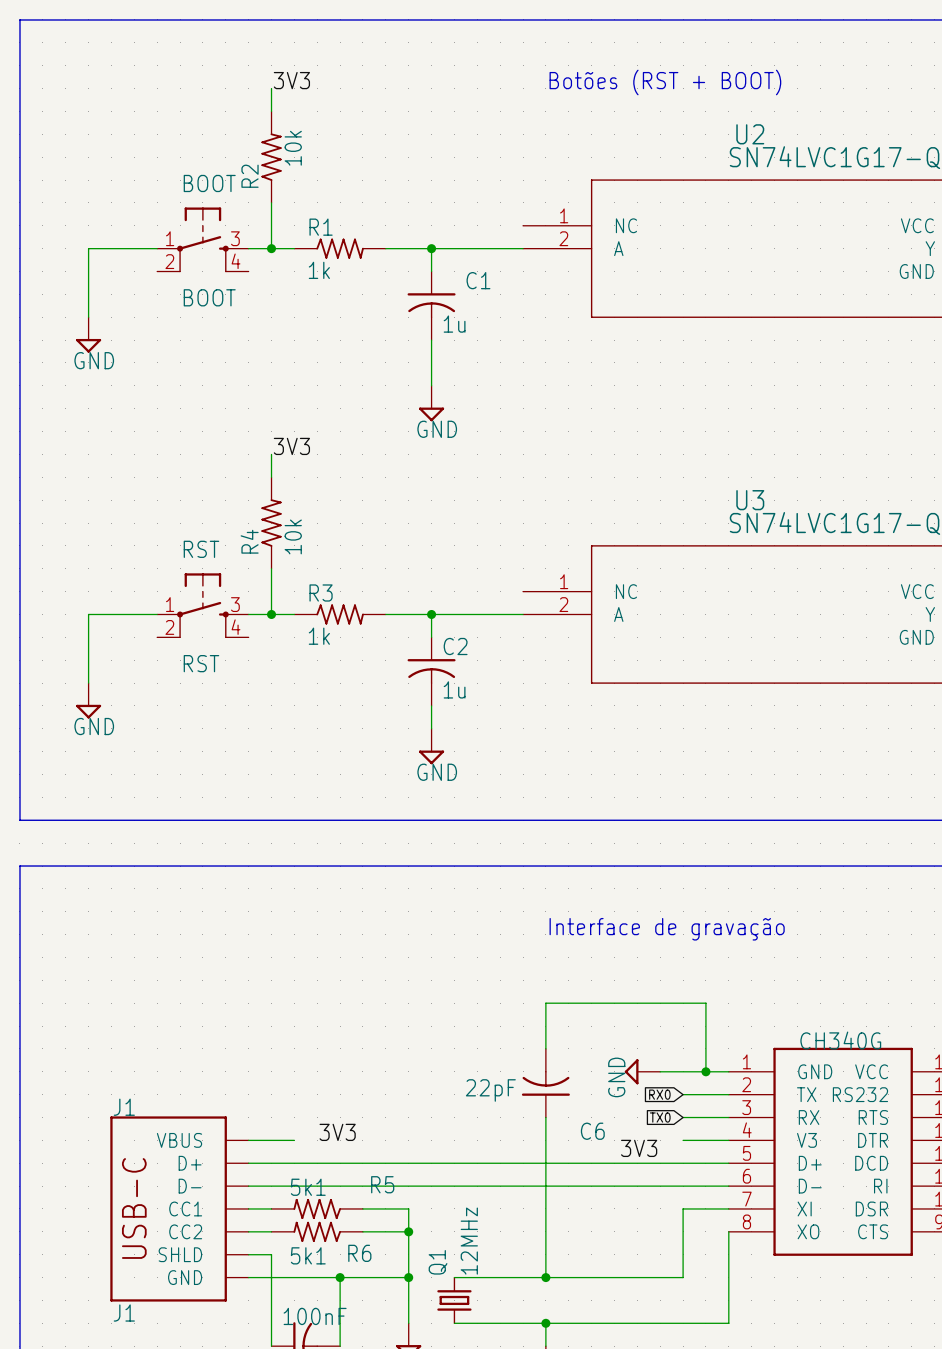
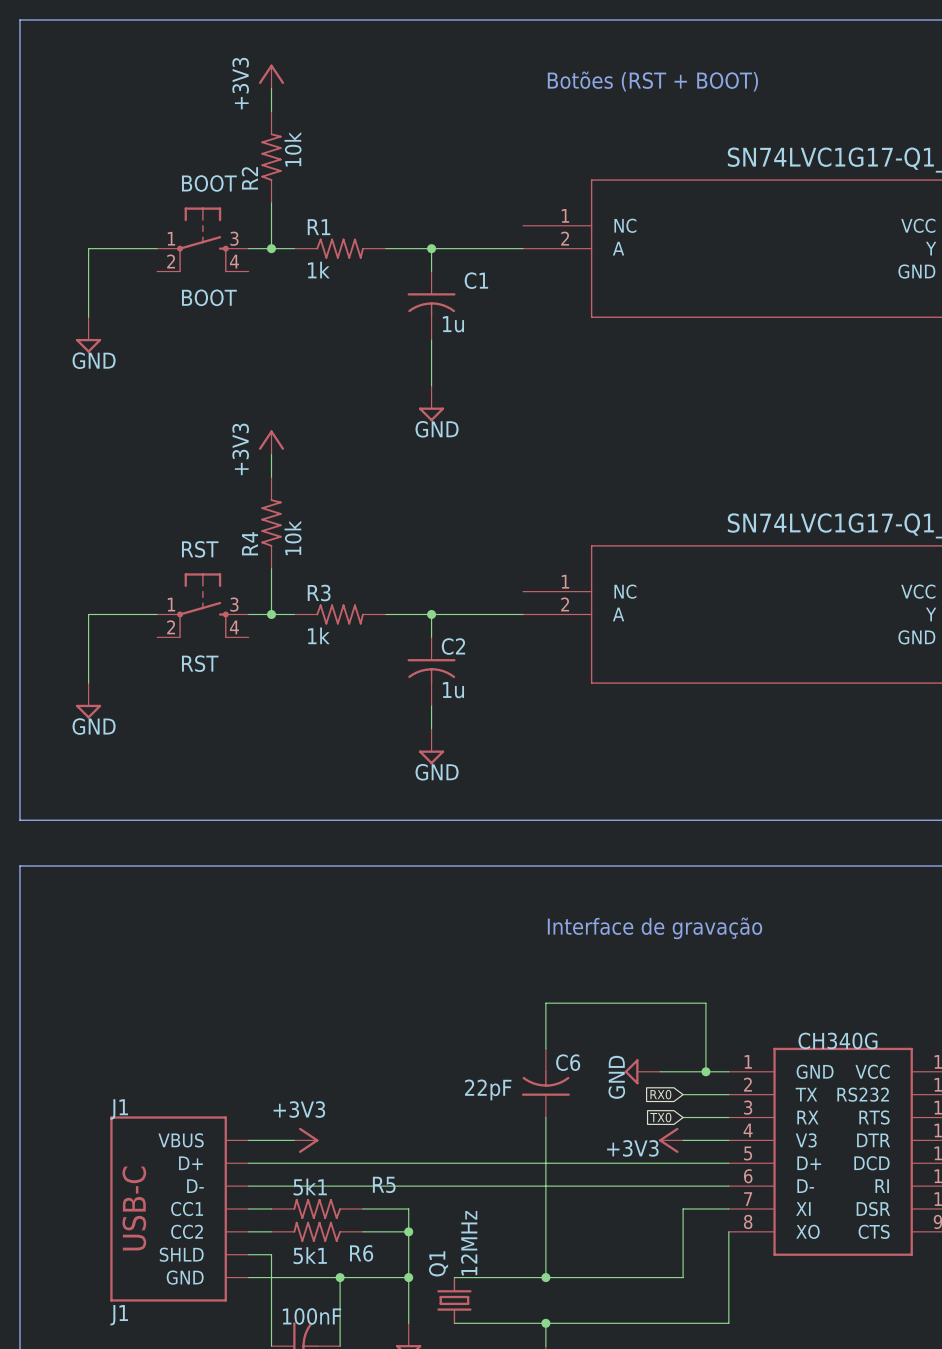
power symbol: none -> +3V3 (271, 76)
label: 3V3 (291, 80) -> none
U2 name: U2 (750, 134) -> none
power symbol: none -> +3V3 (271, 442)
label: 3V3 (291, 446) -> none
U3 name: U3 (750, 500) -> none
C6 name position: C6 (592, 1131) -> C6 (568, 1062)
label: 3V3 (337, 1132) -> none
power symbol: none -> +3V3 (306, 1140)
power symbol: none -> +3V3 (671, 1140)
label: 3V3 (639, 1148) -> none

